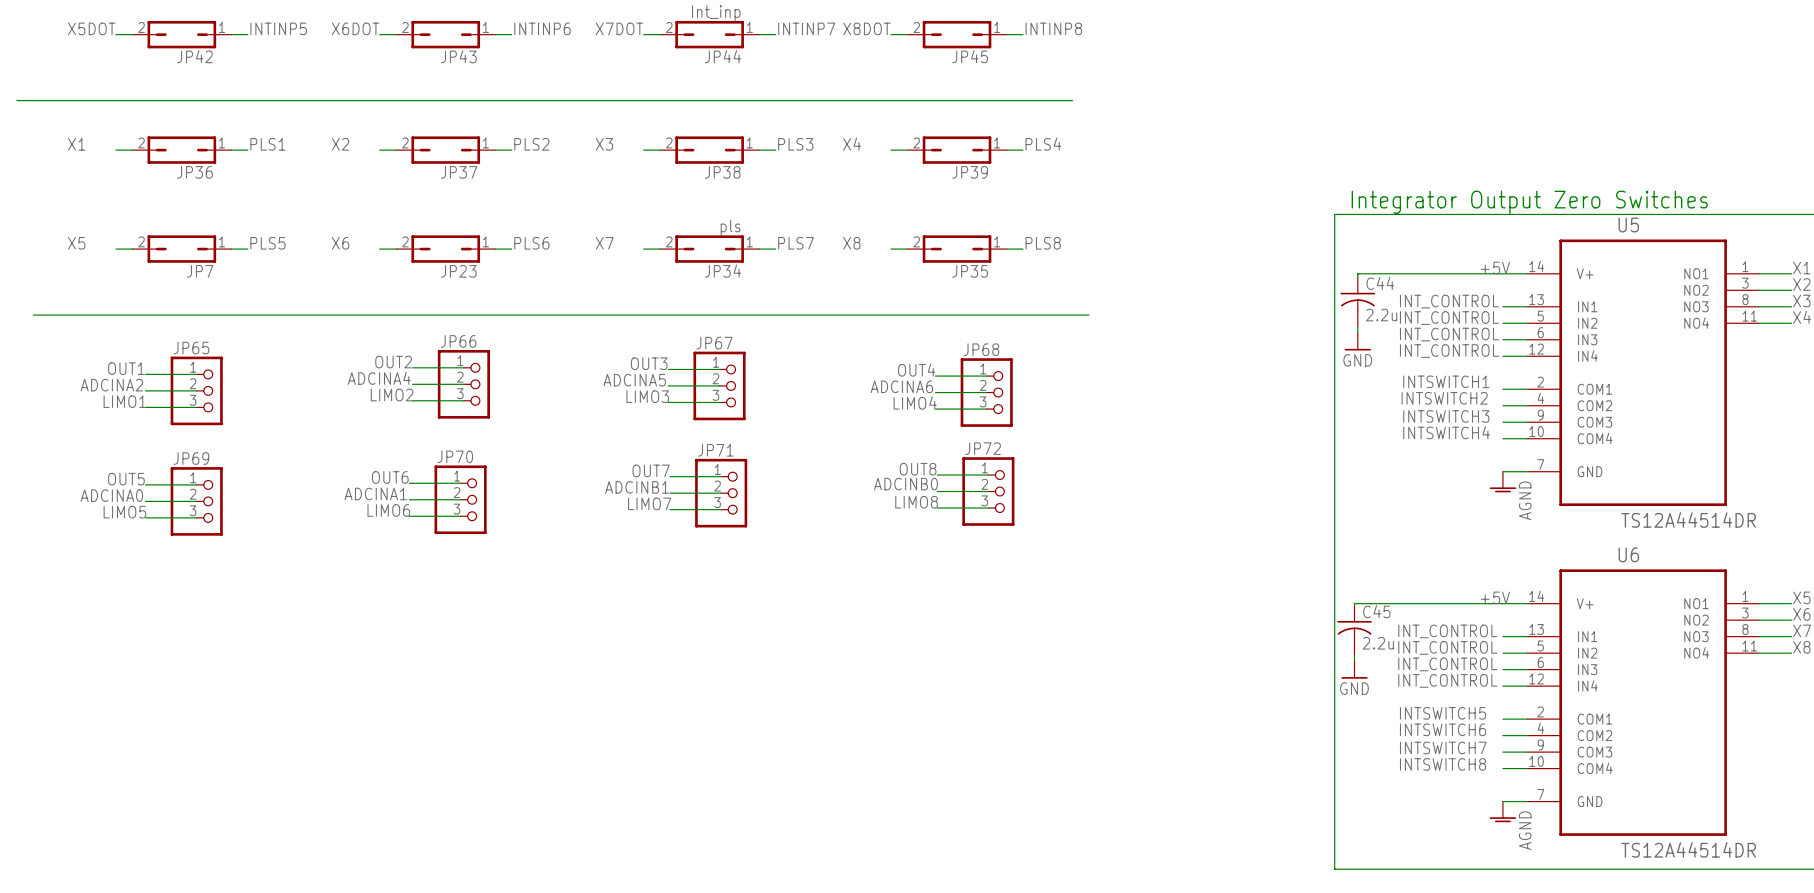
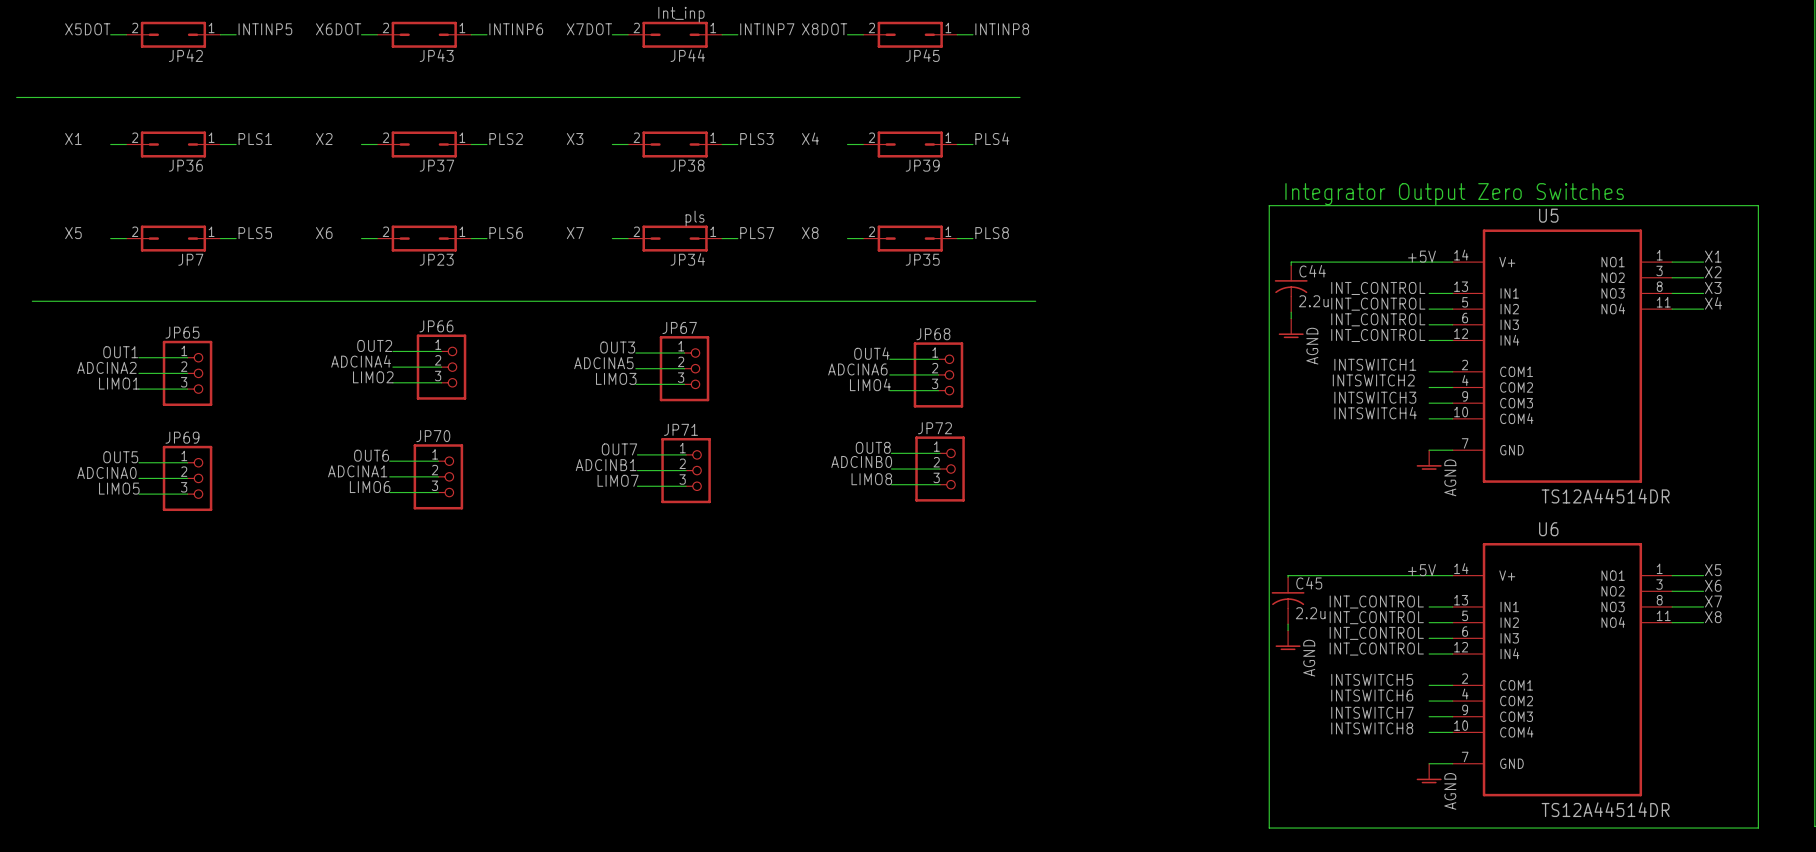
power symbol: GND (1357, 341) -> AGND (1291, 328)
power symbol: GND (1354, 670) -> AGND (1288, 640)

